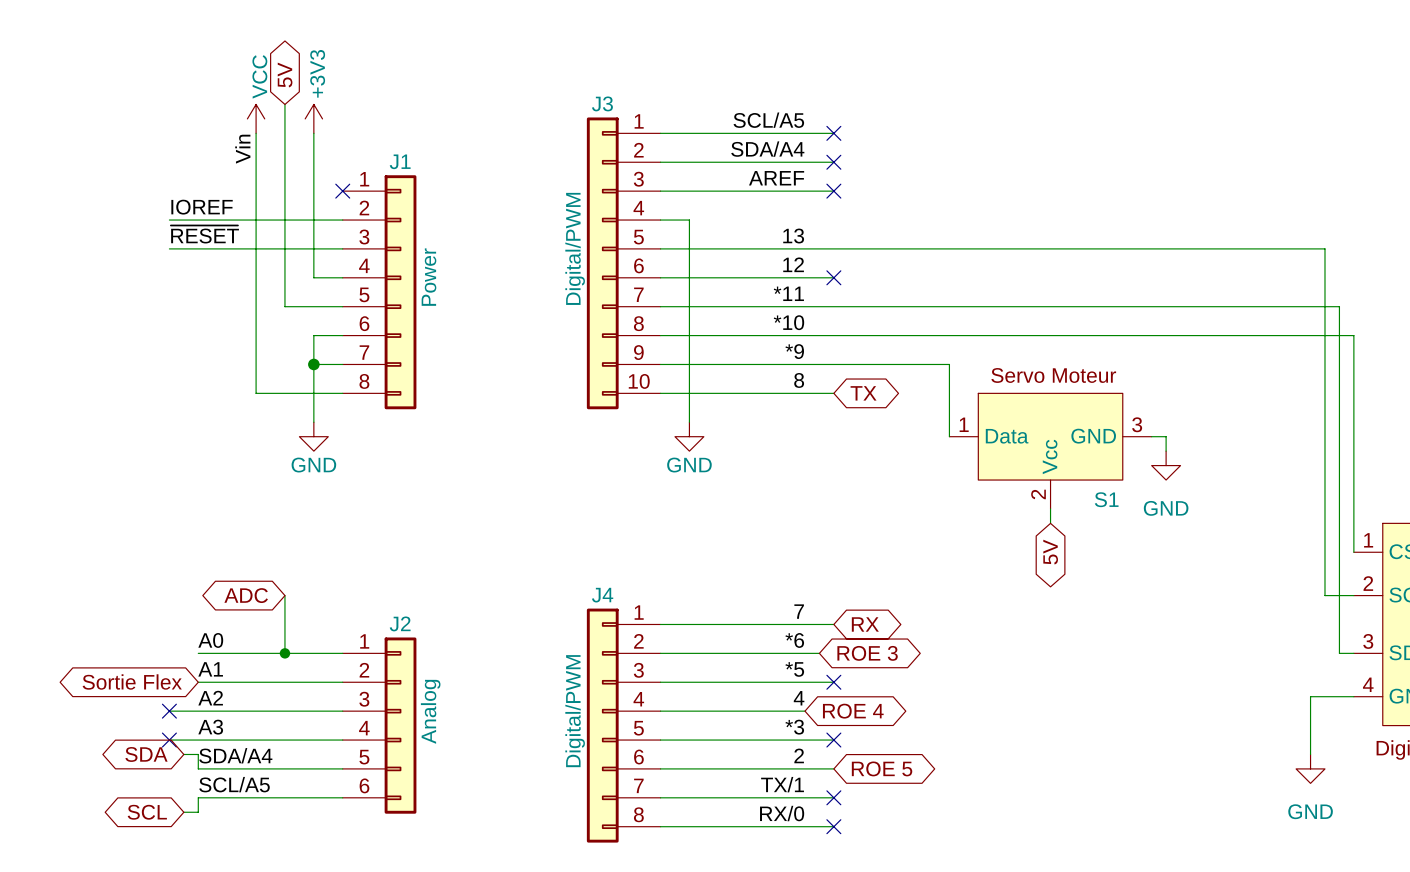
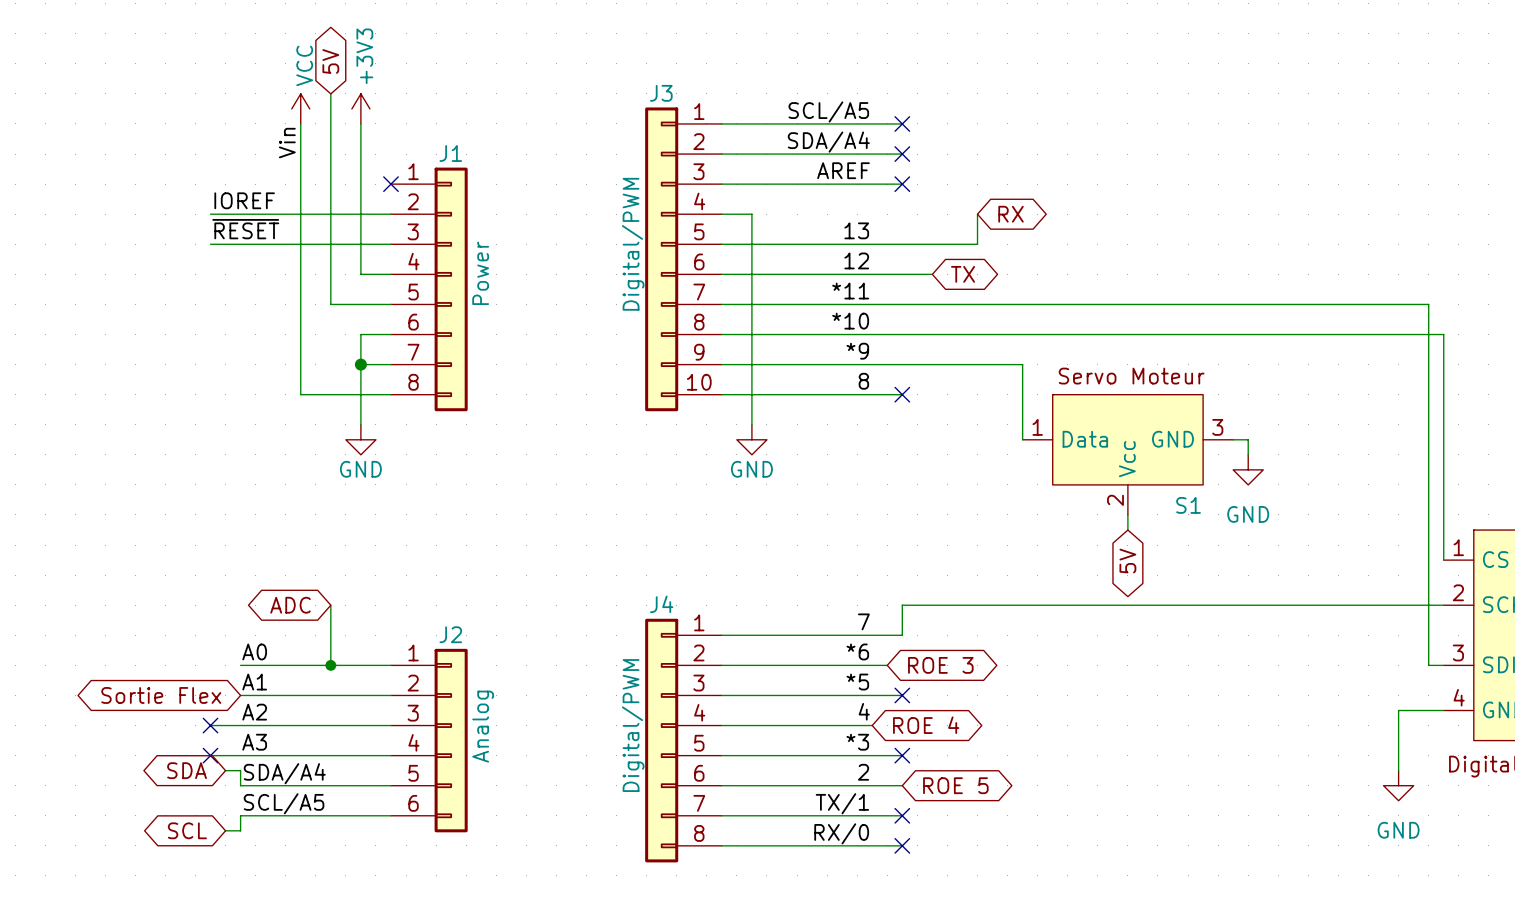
wire: none -> (977, 214) (977, 244)
global label: none -> RX (1011, 214)
wire: (906, 248) (1324, 248) (1324, 595) -> (902, 635) (902, 605) (1413, 605)
wire: none -> (902, 274) (932, 274)
no-connect mark: (833, 277) -> none
no-connect mark: none -> (902, 394)
global label position: TX (863, 393) -> TX (963, 274)
global label: RX (865, 624) -> none

